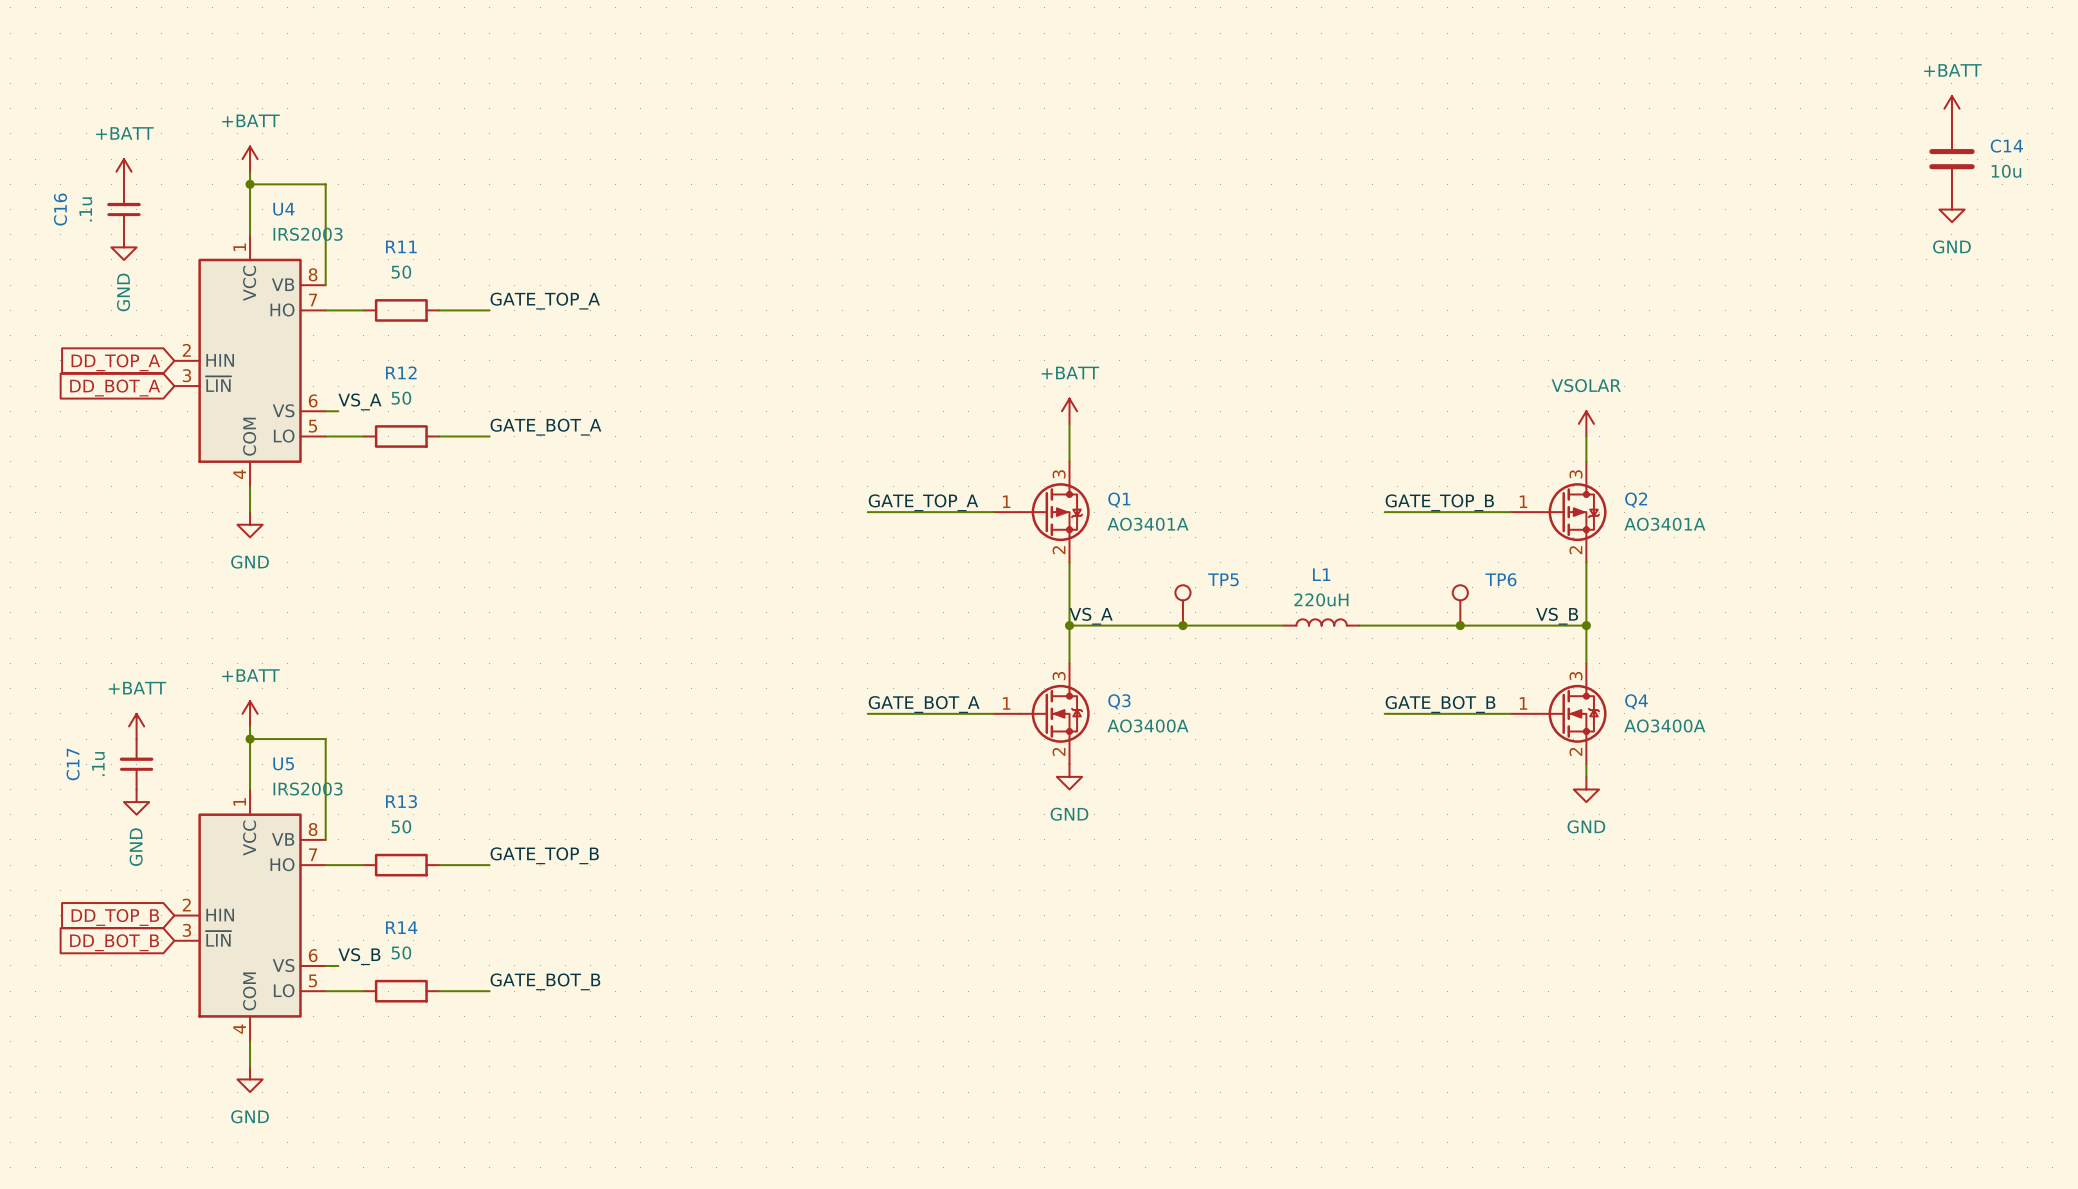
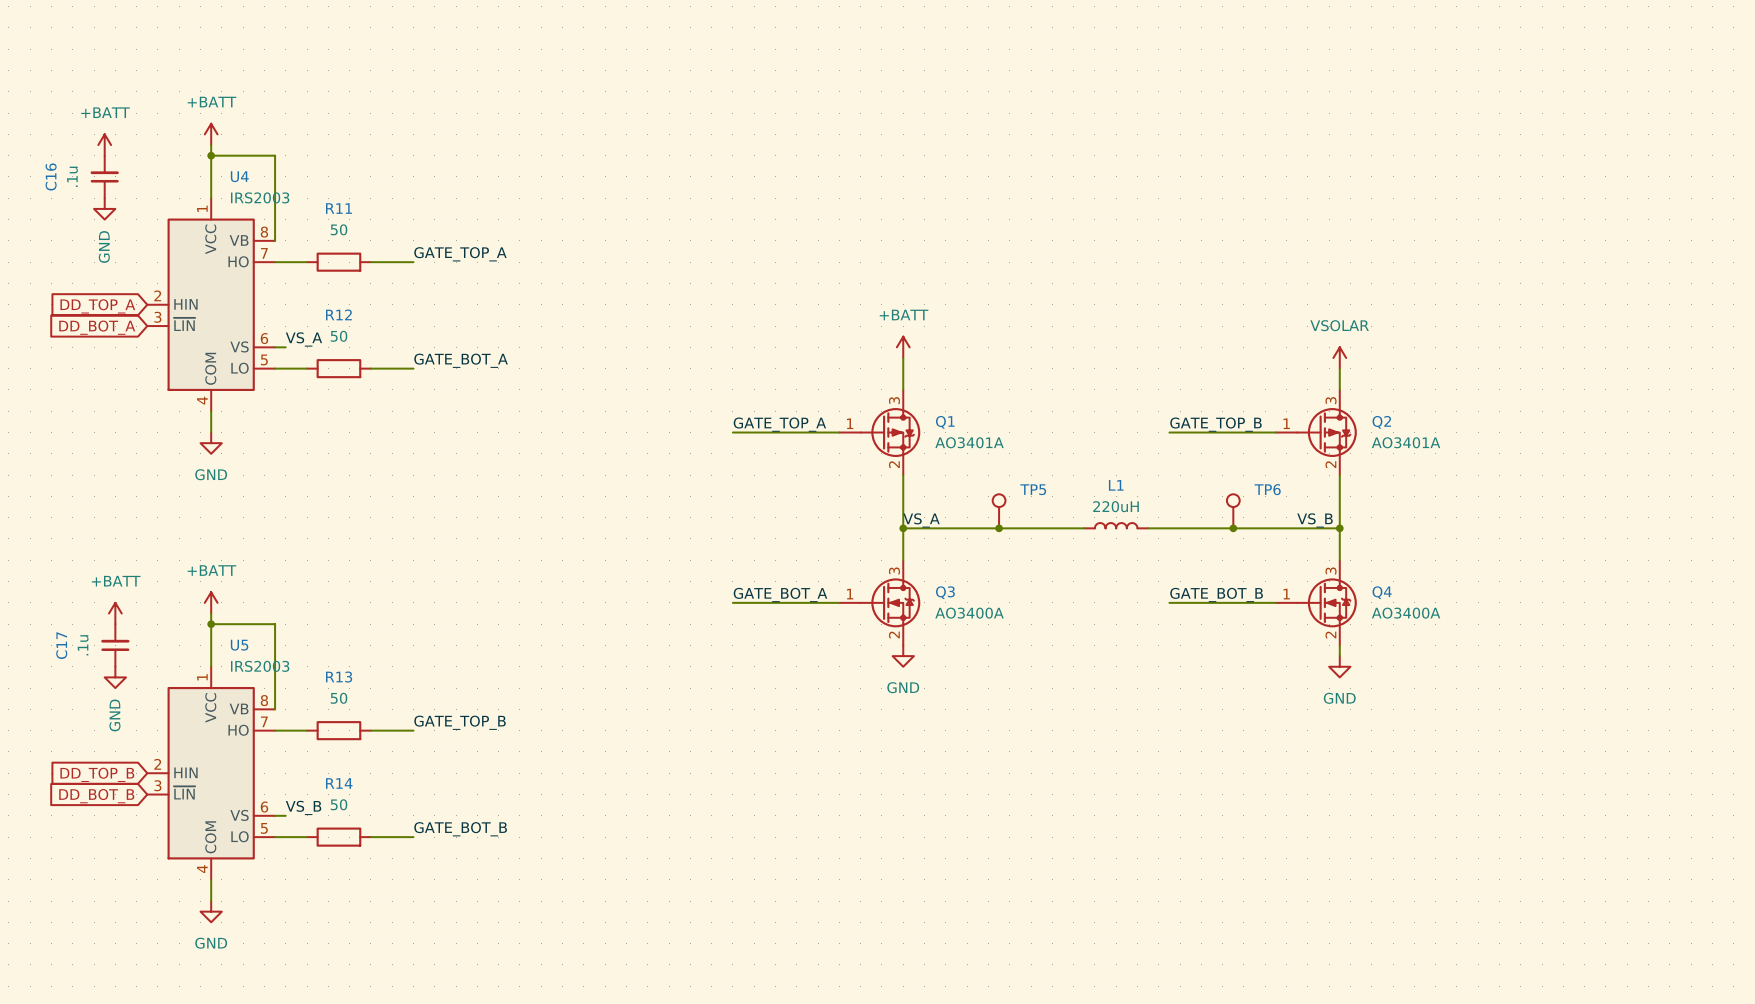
power symbol: +BATT (1951, 108) -> none
C14: 10u (1951, 159) -> none
power symbol: GND (1951, 209) -> none

